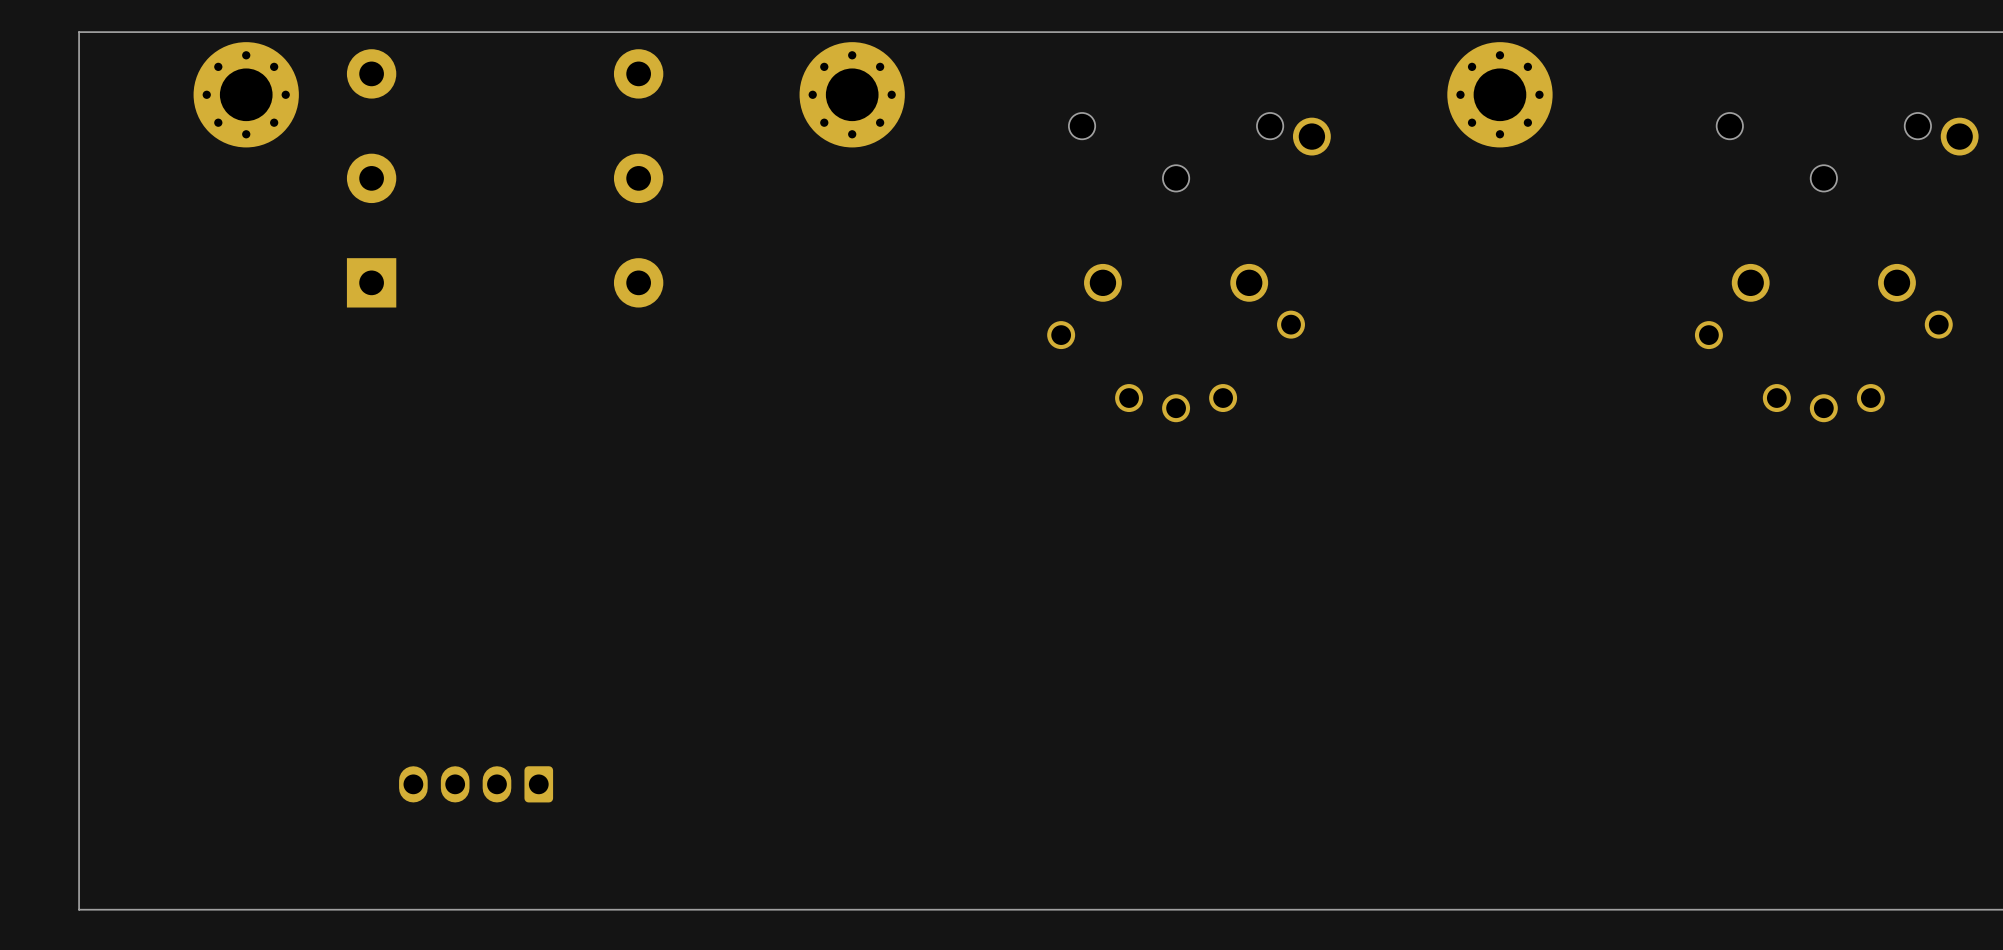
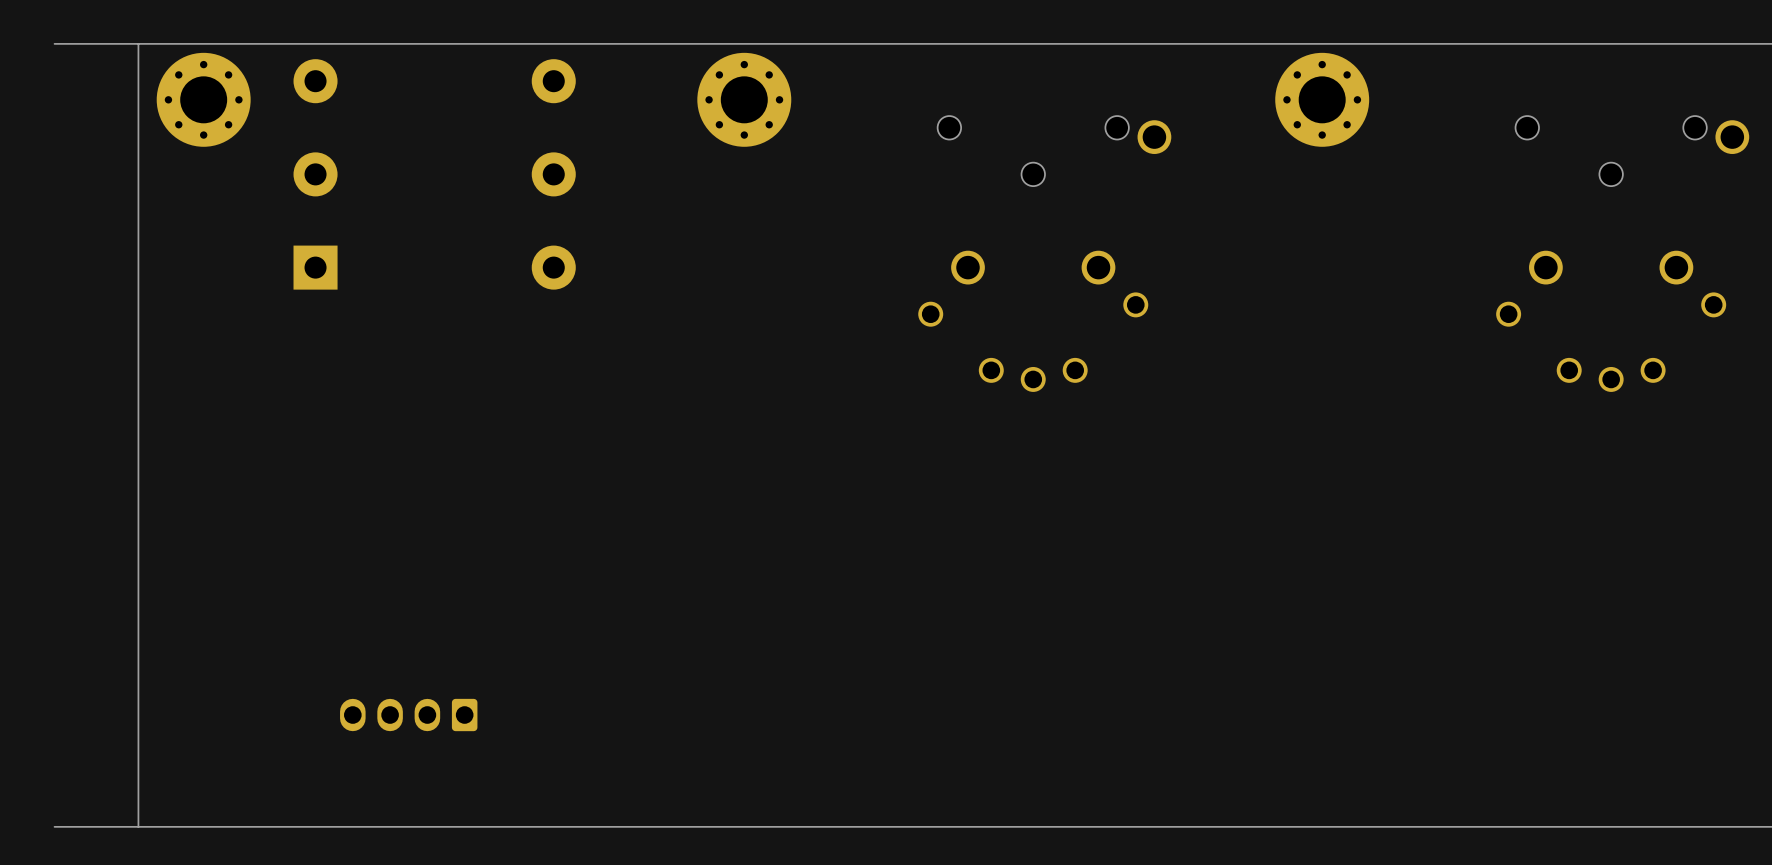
board edge: (79, 32) (79, 909) -> (138, 43) (138, 826)

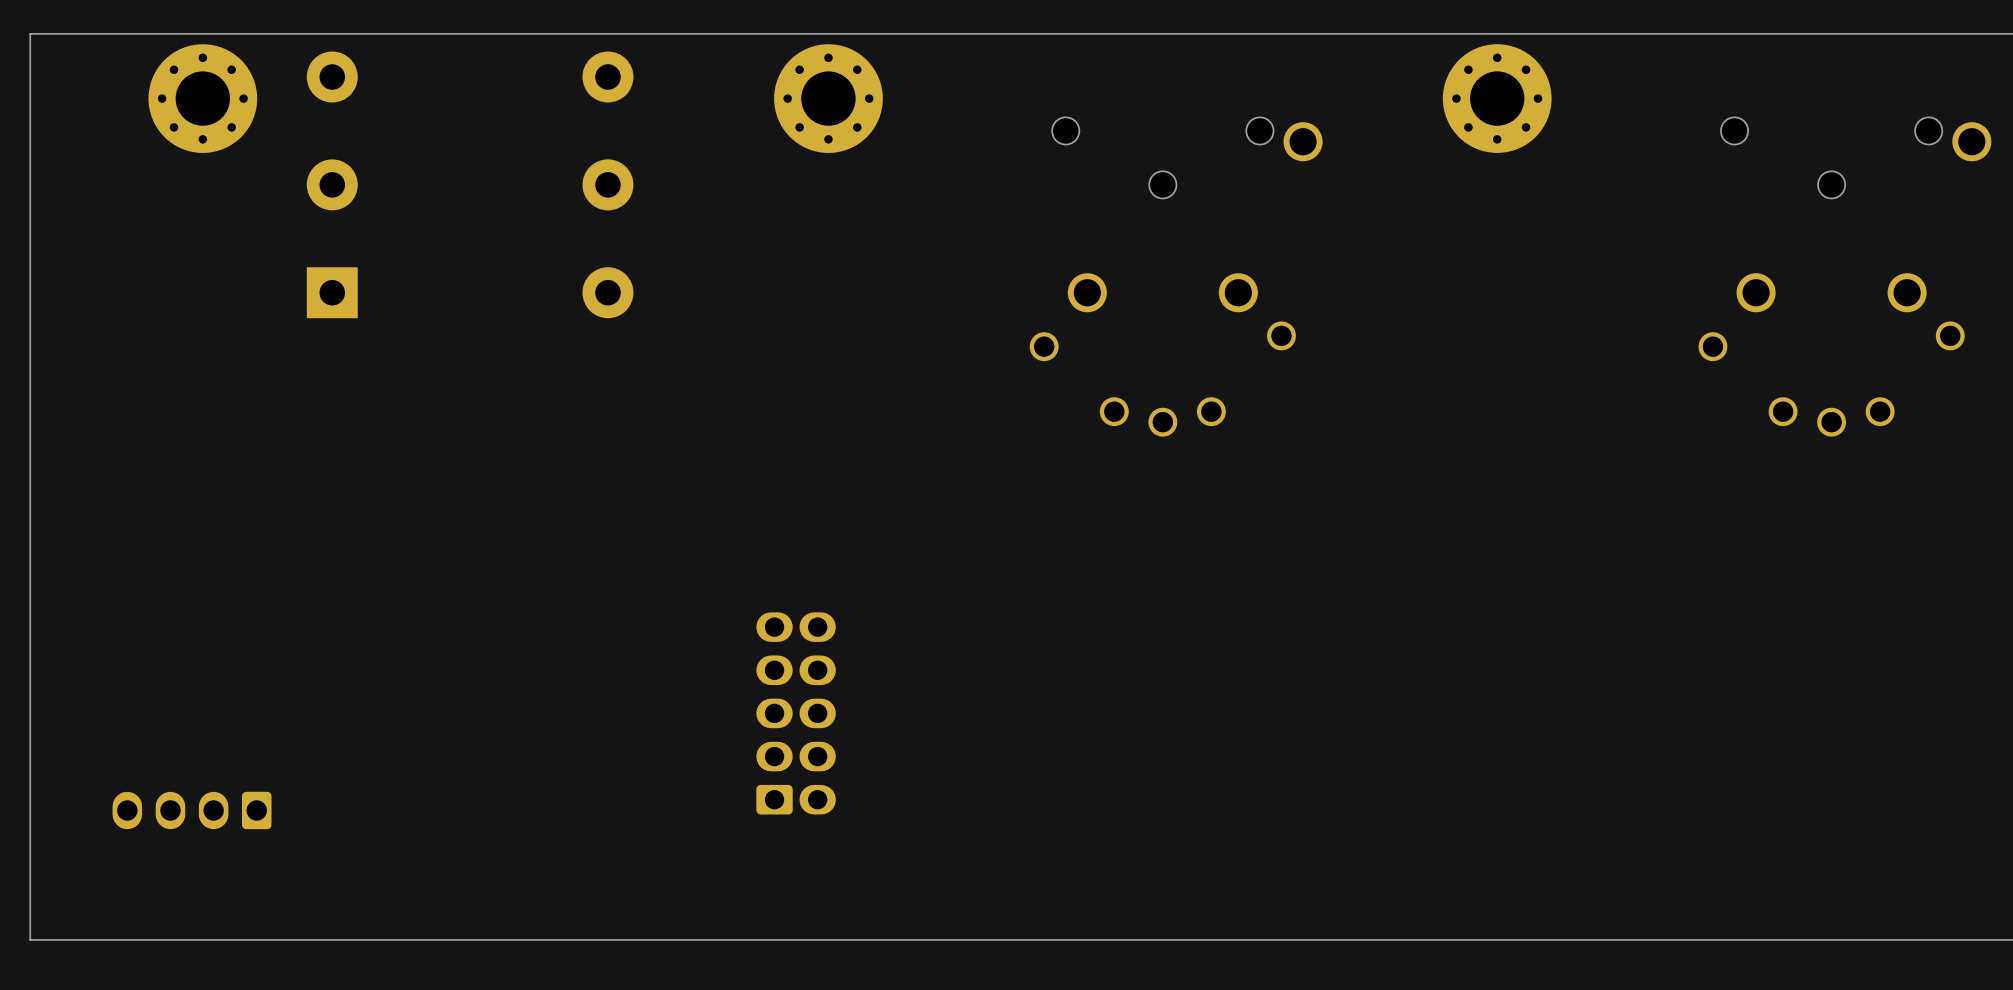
board edge: (138, 43) (138, 826) -> (30, 33) (30, 939)
part: none -> (796, 713)
part position: (408, 715) -> (192, 810)

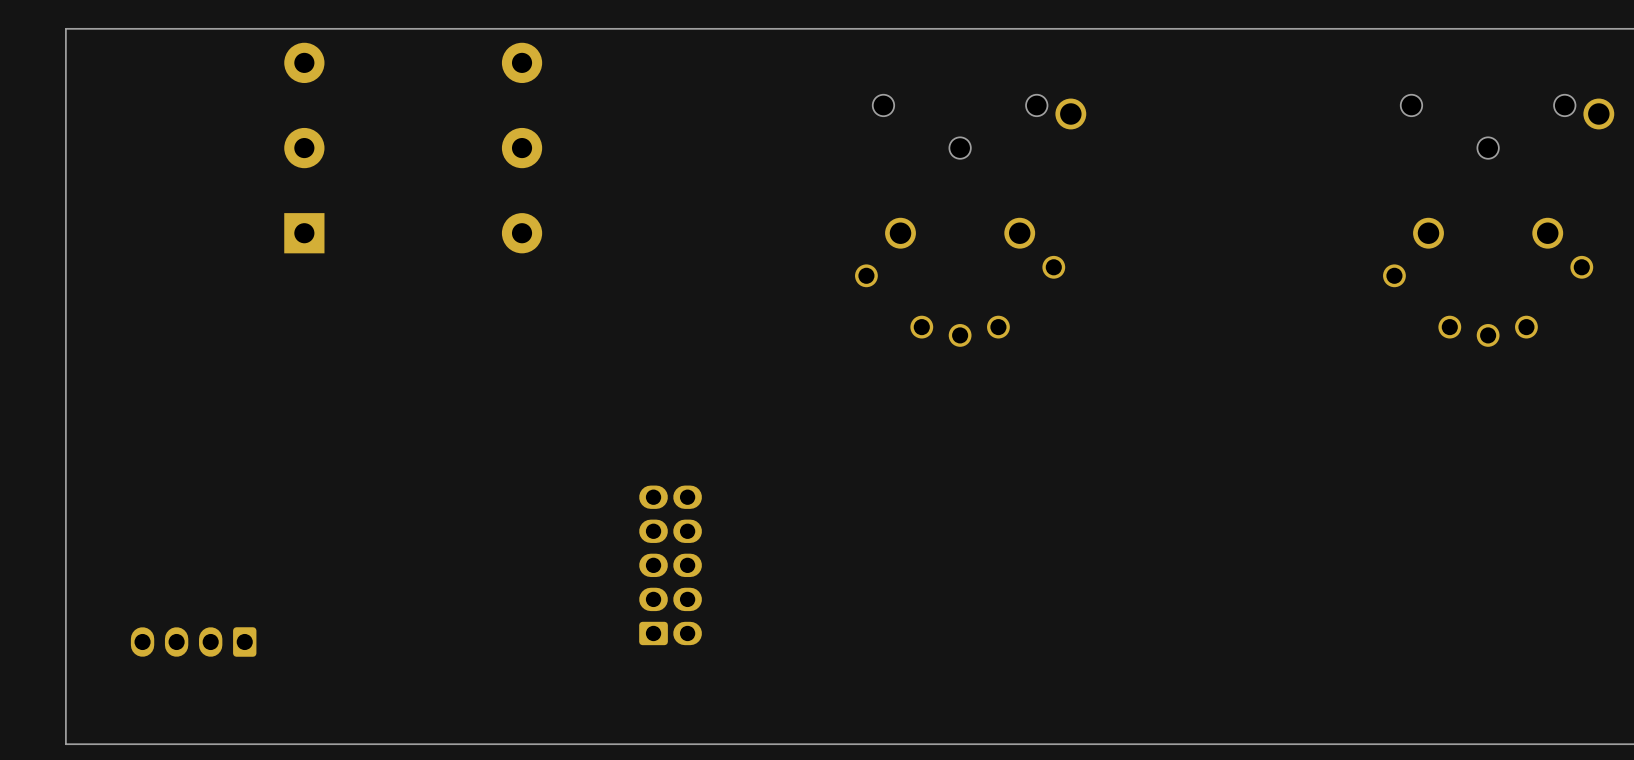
part: (202, 98) -> none
part: (828, 98) -> none
part: (1497, 98) -> none

